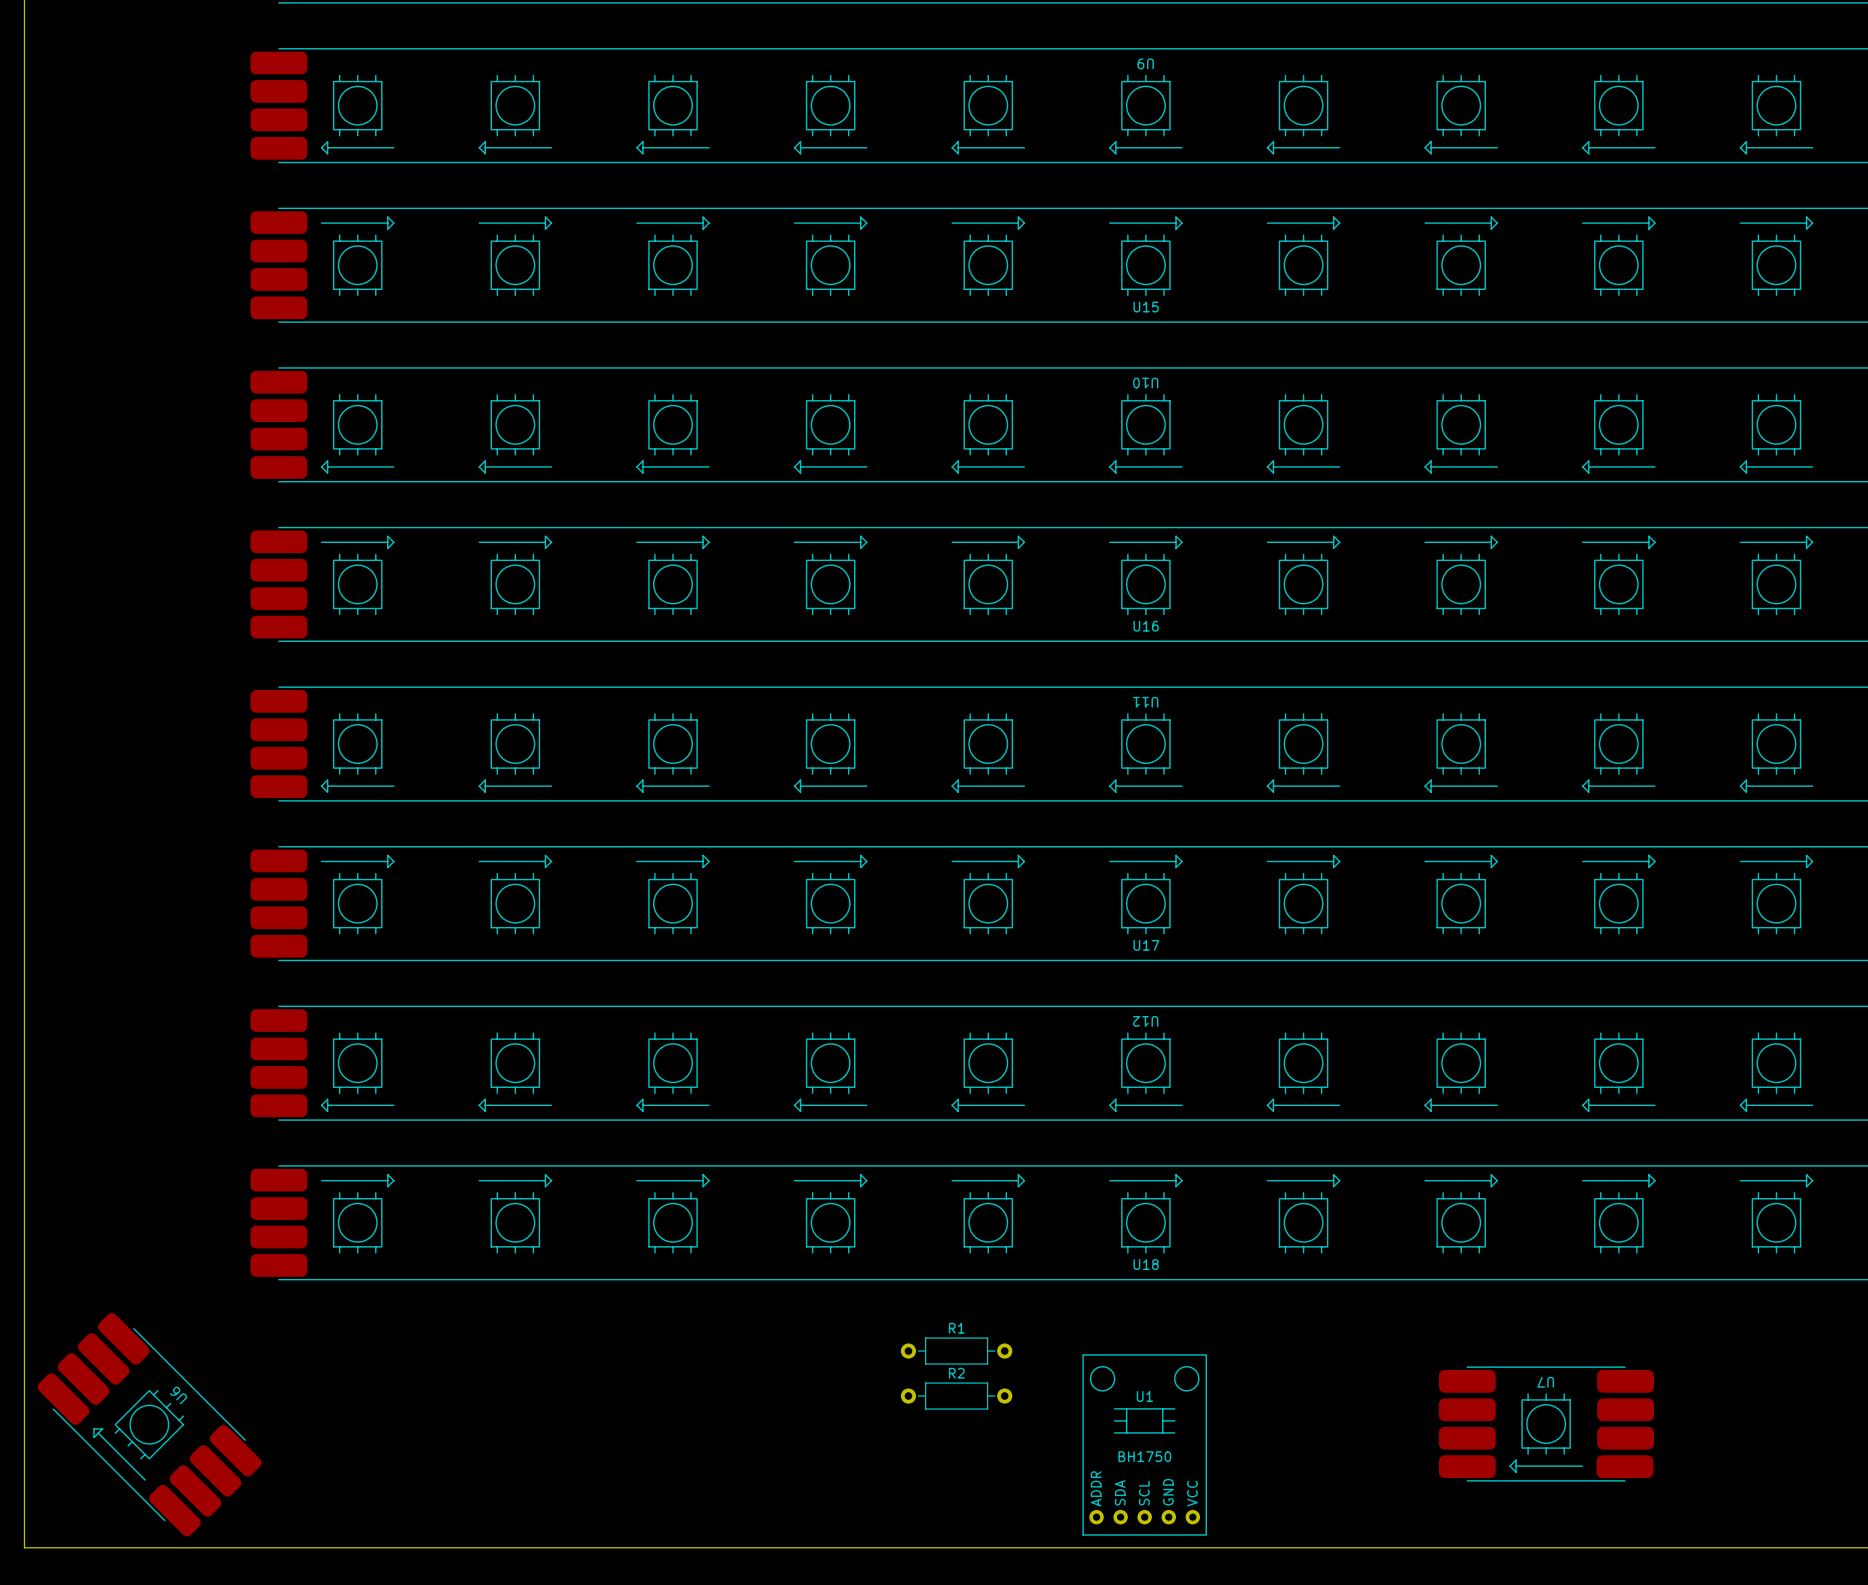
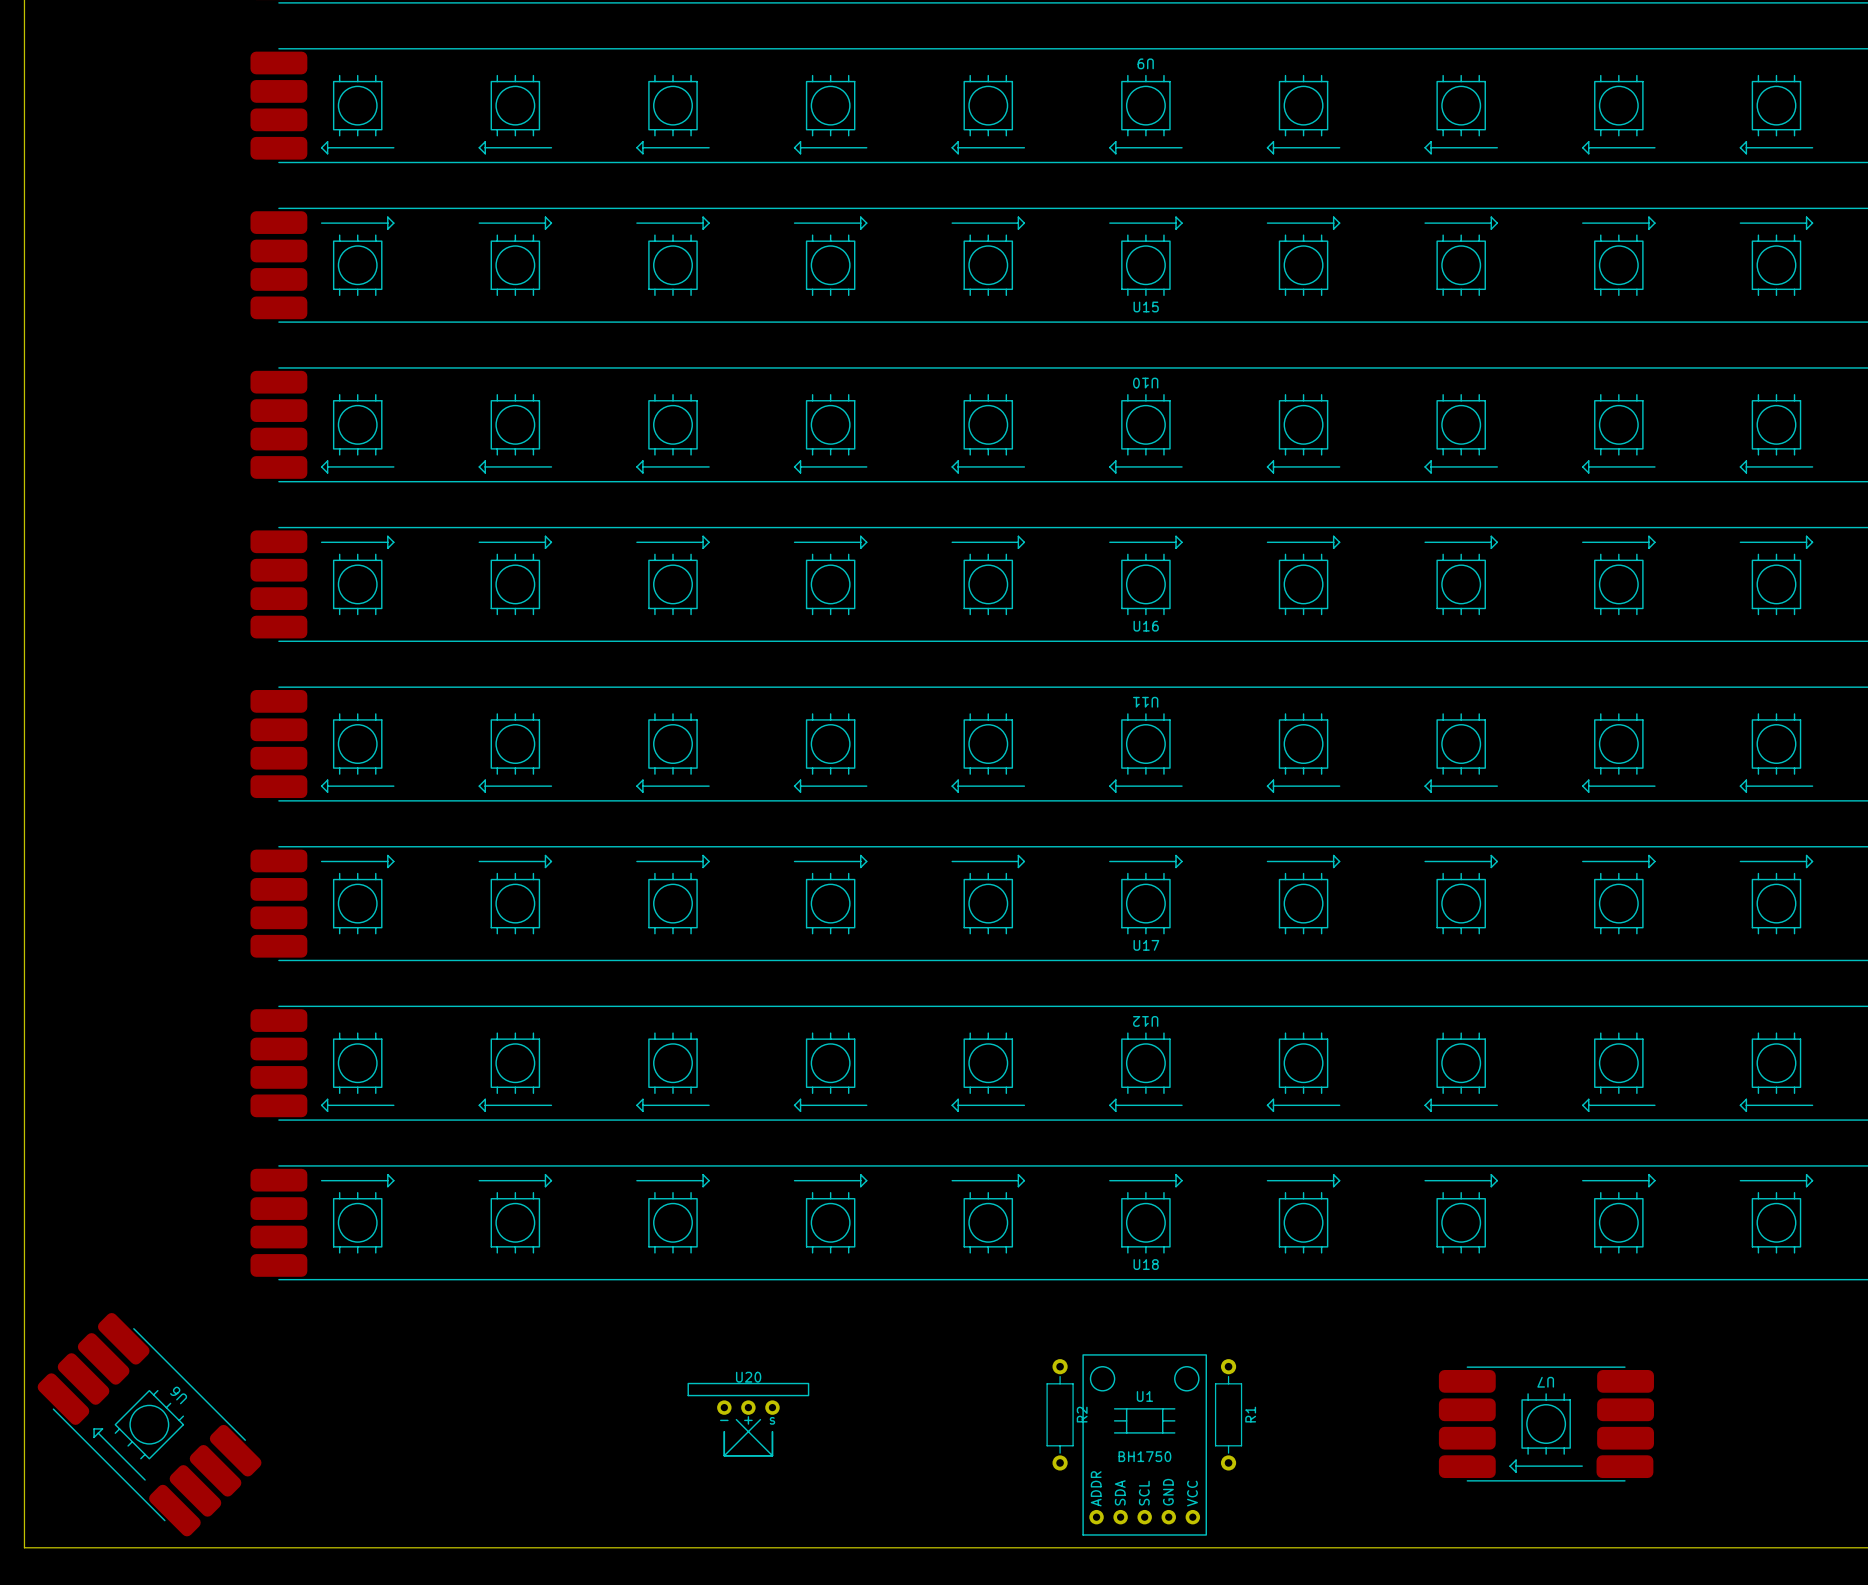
R1 rotation: 0° (956, 1351) -> 90° clockwise (1228, 1414)
R1 position: (956, 1351) -> (1228, 1414)
R2 rotation: 0° (956, 1396) -> 90° clockwise (1060, 1414)
R2 position: (956, 1396) -> (1060, 1414)
U20: none -> (748, 1419)

